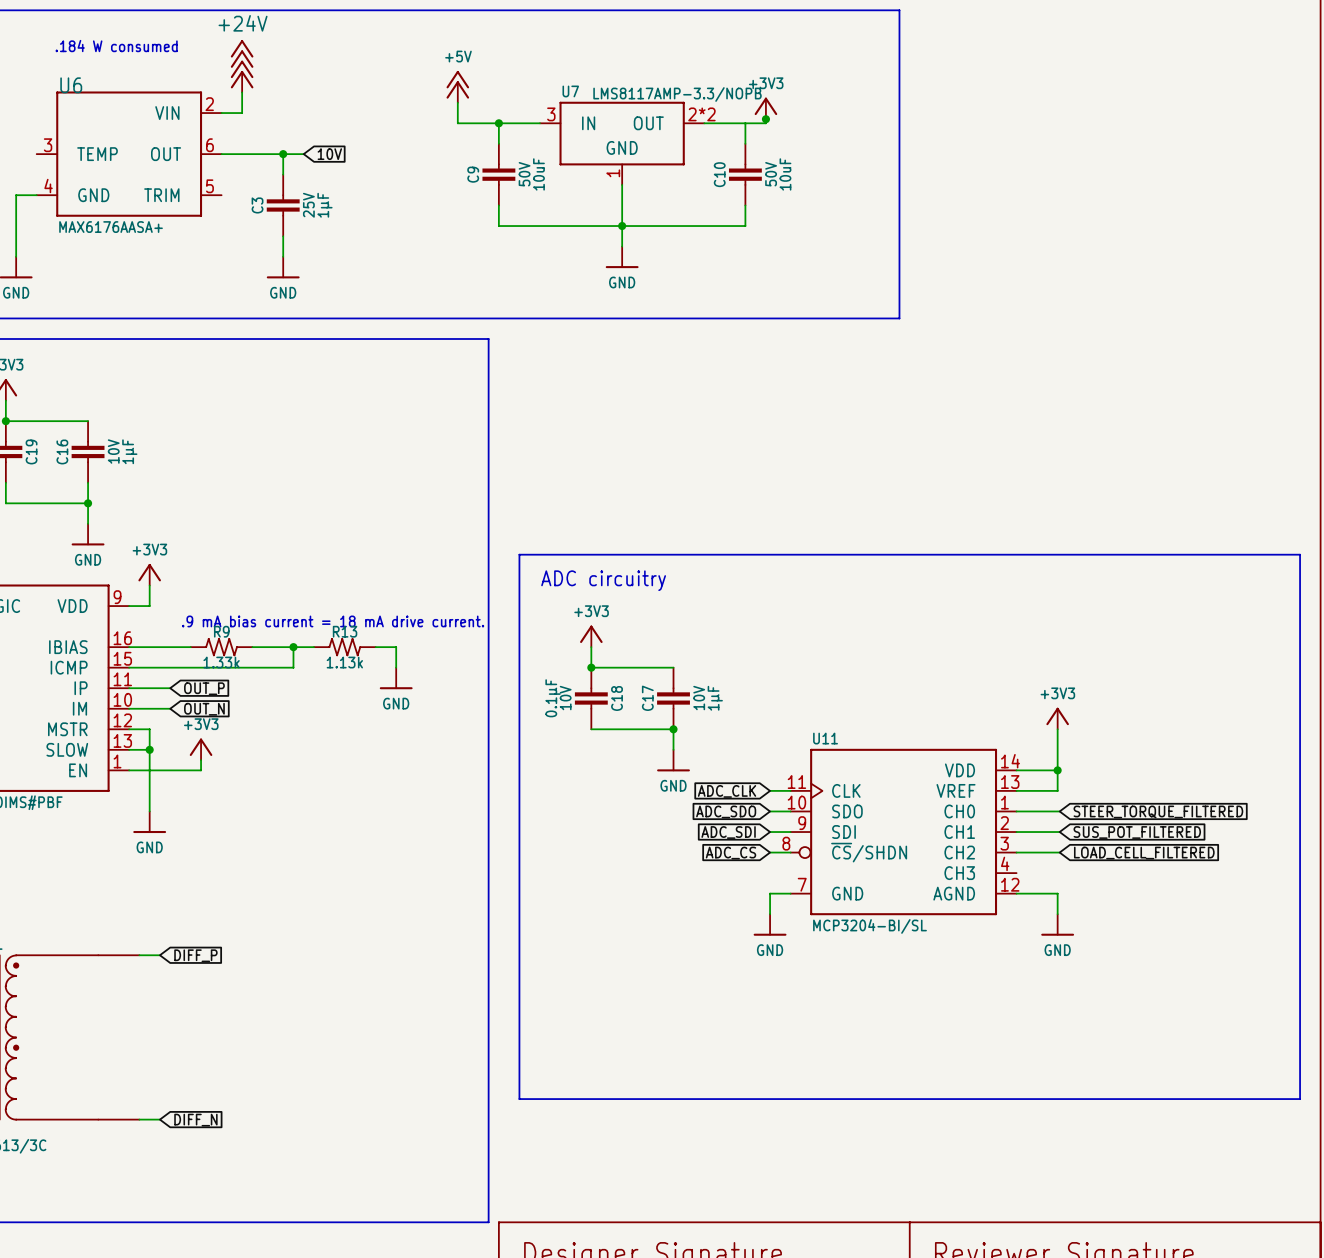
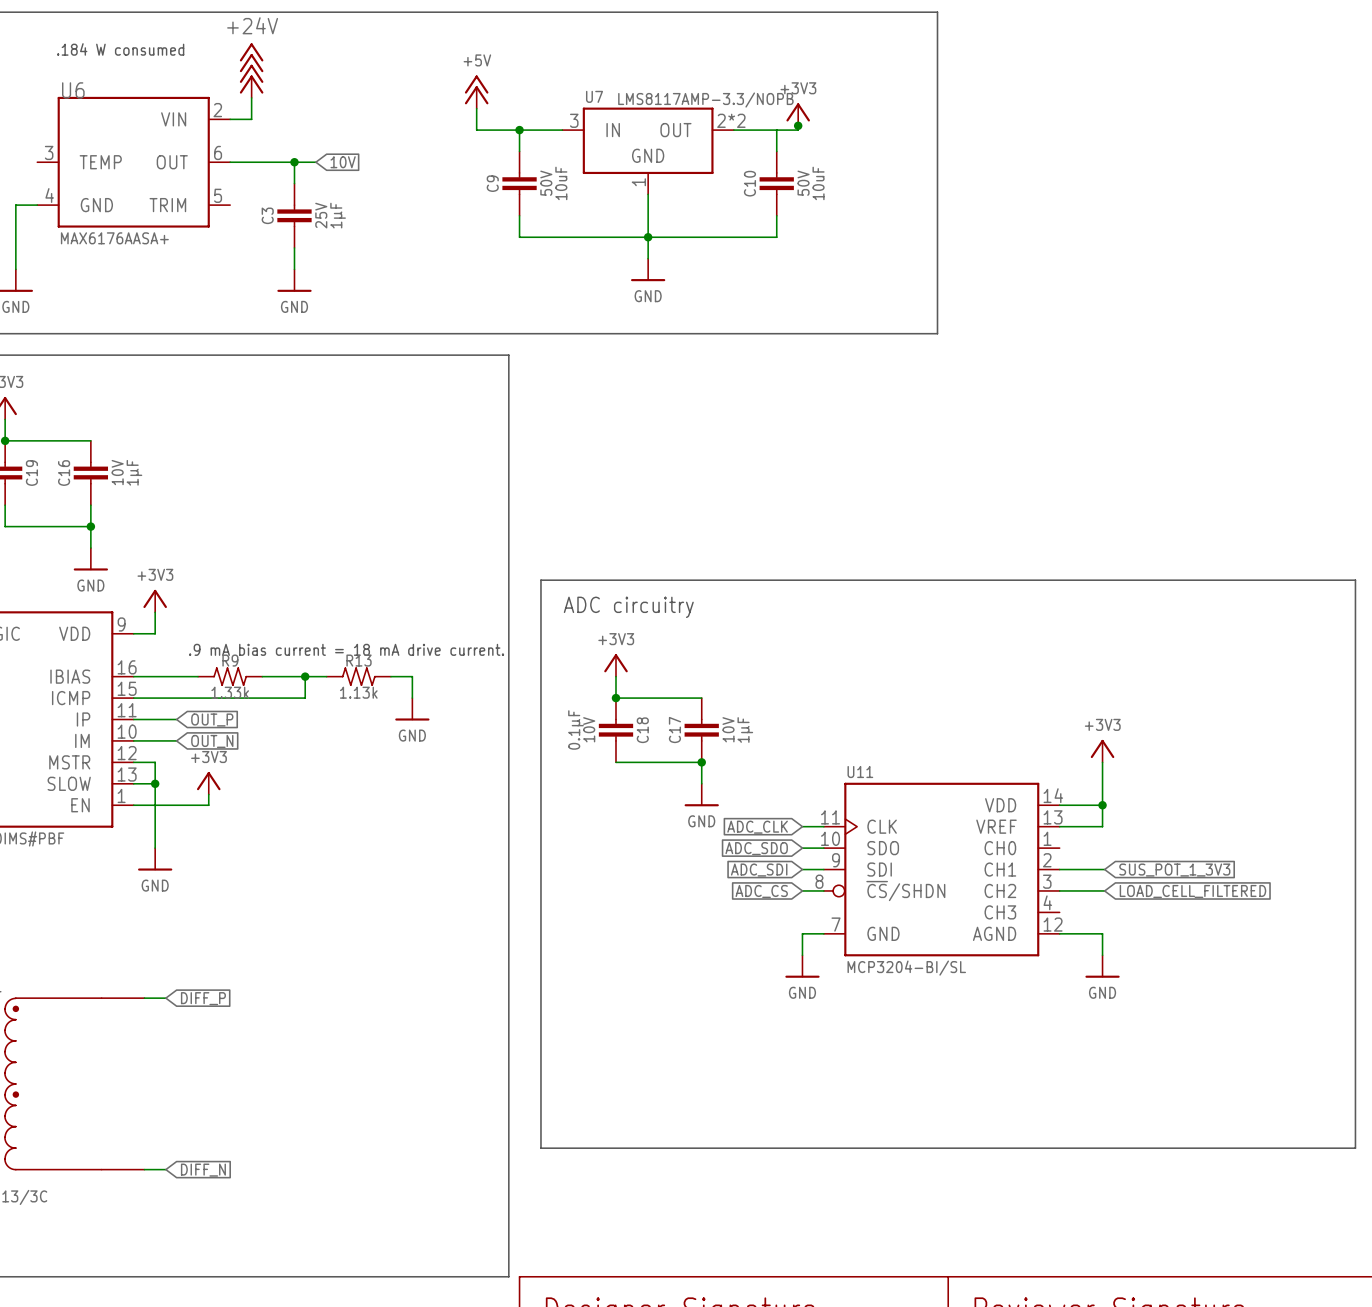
wire: (1016, 811) (1059, 811) -> none
global label: STEER_TORQUE_FILTERED (1158, 811) -> none
global label: SUS_POT_FILTERED (1137, 832) -> SUS_POT_1_3V3 (1174, 870)

